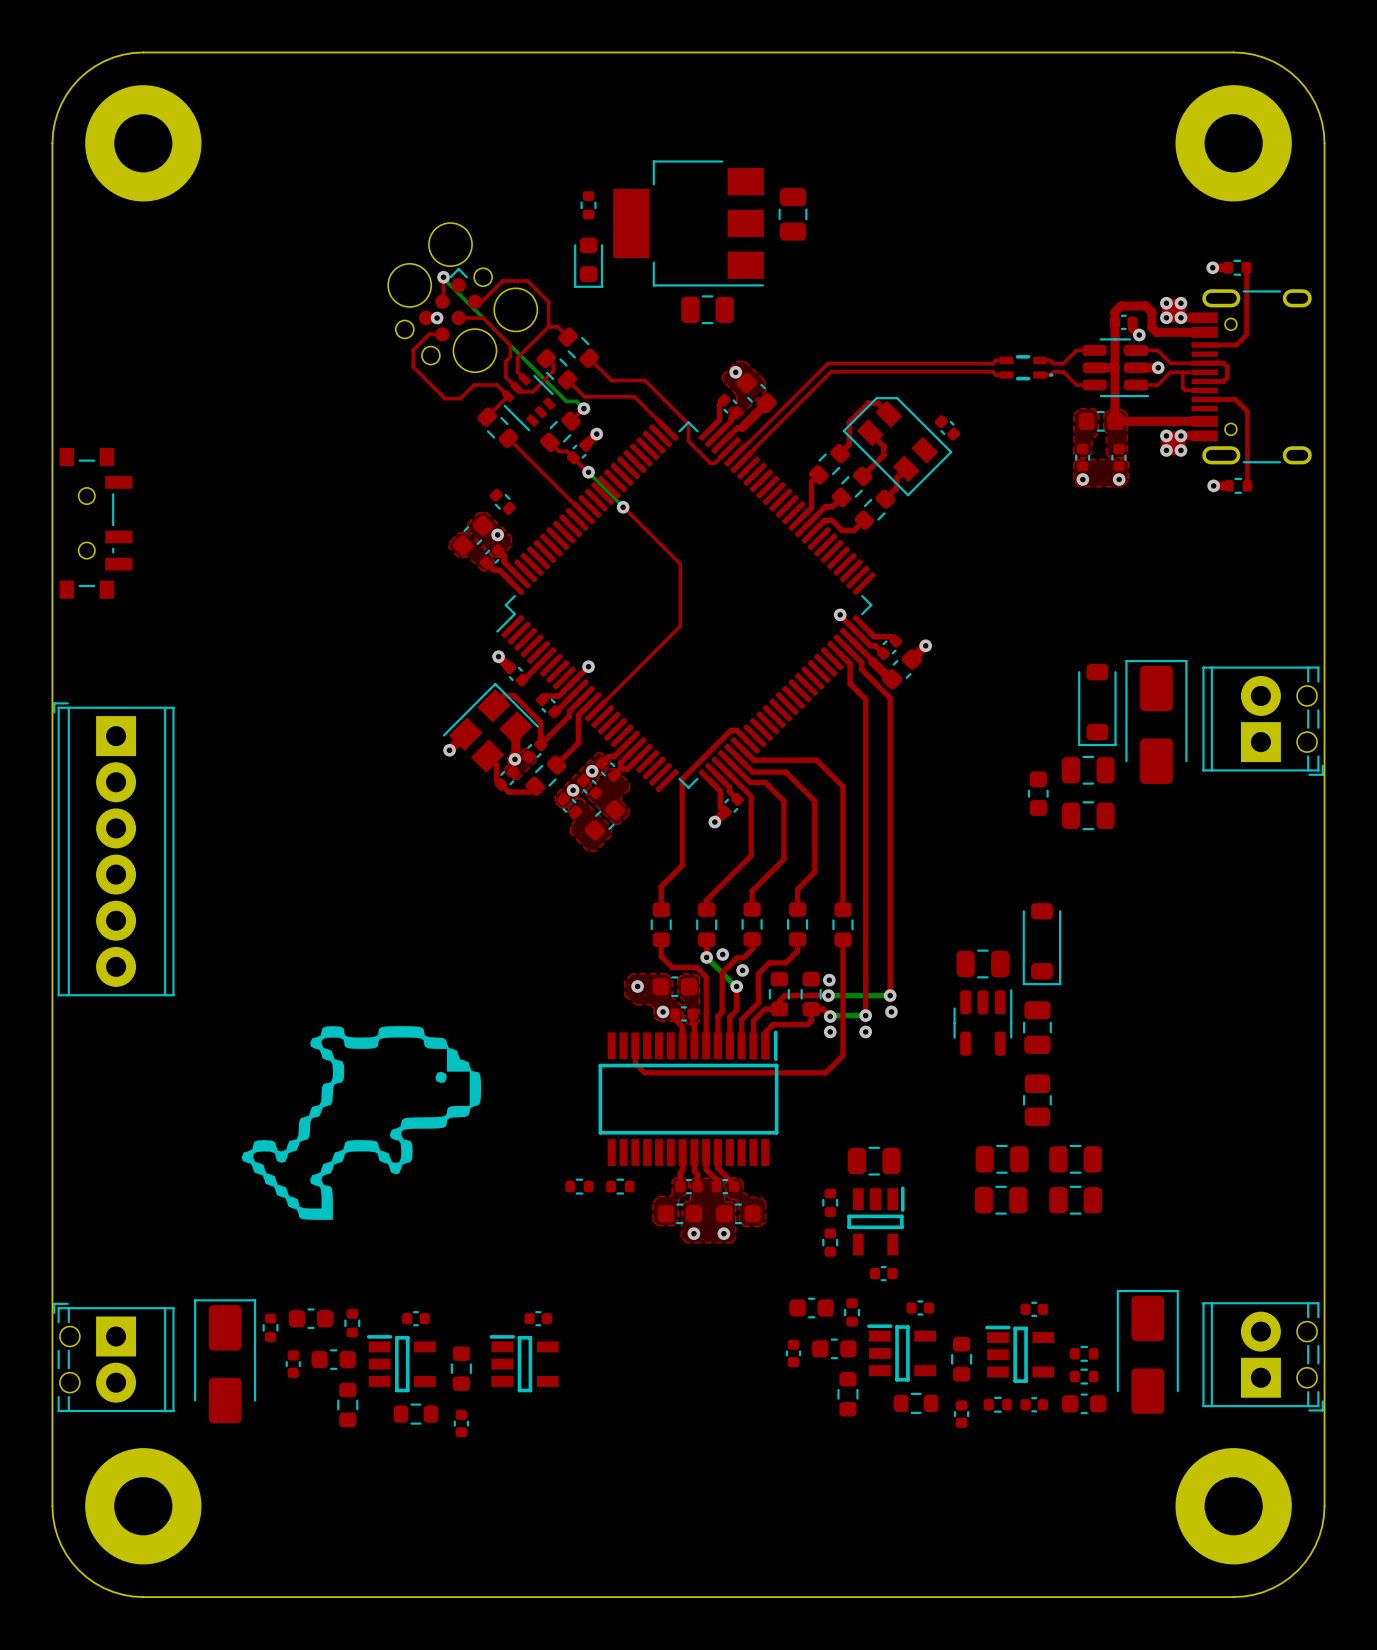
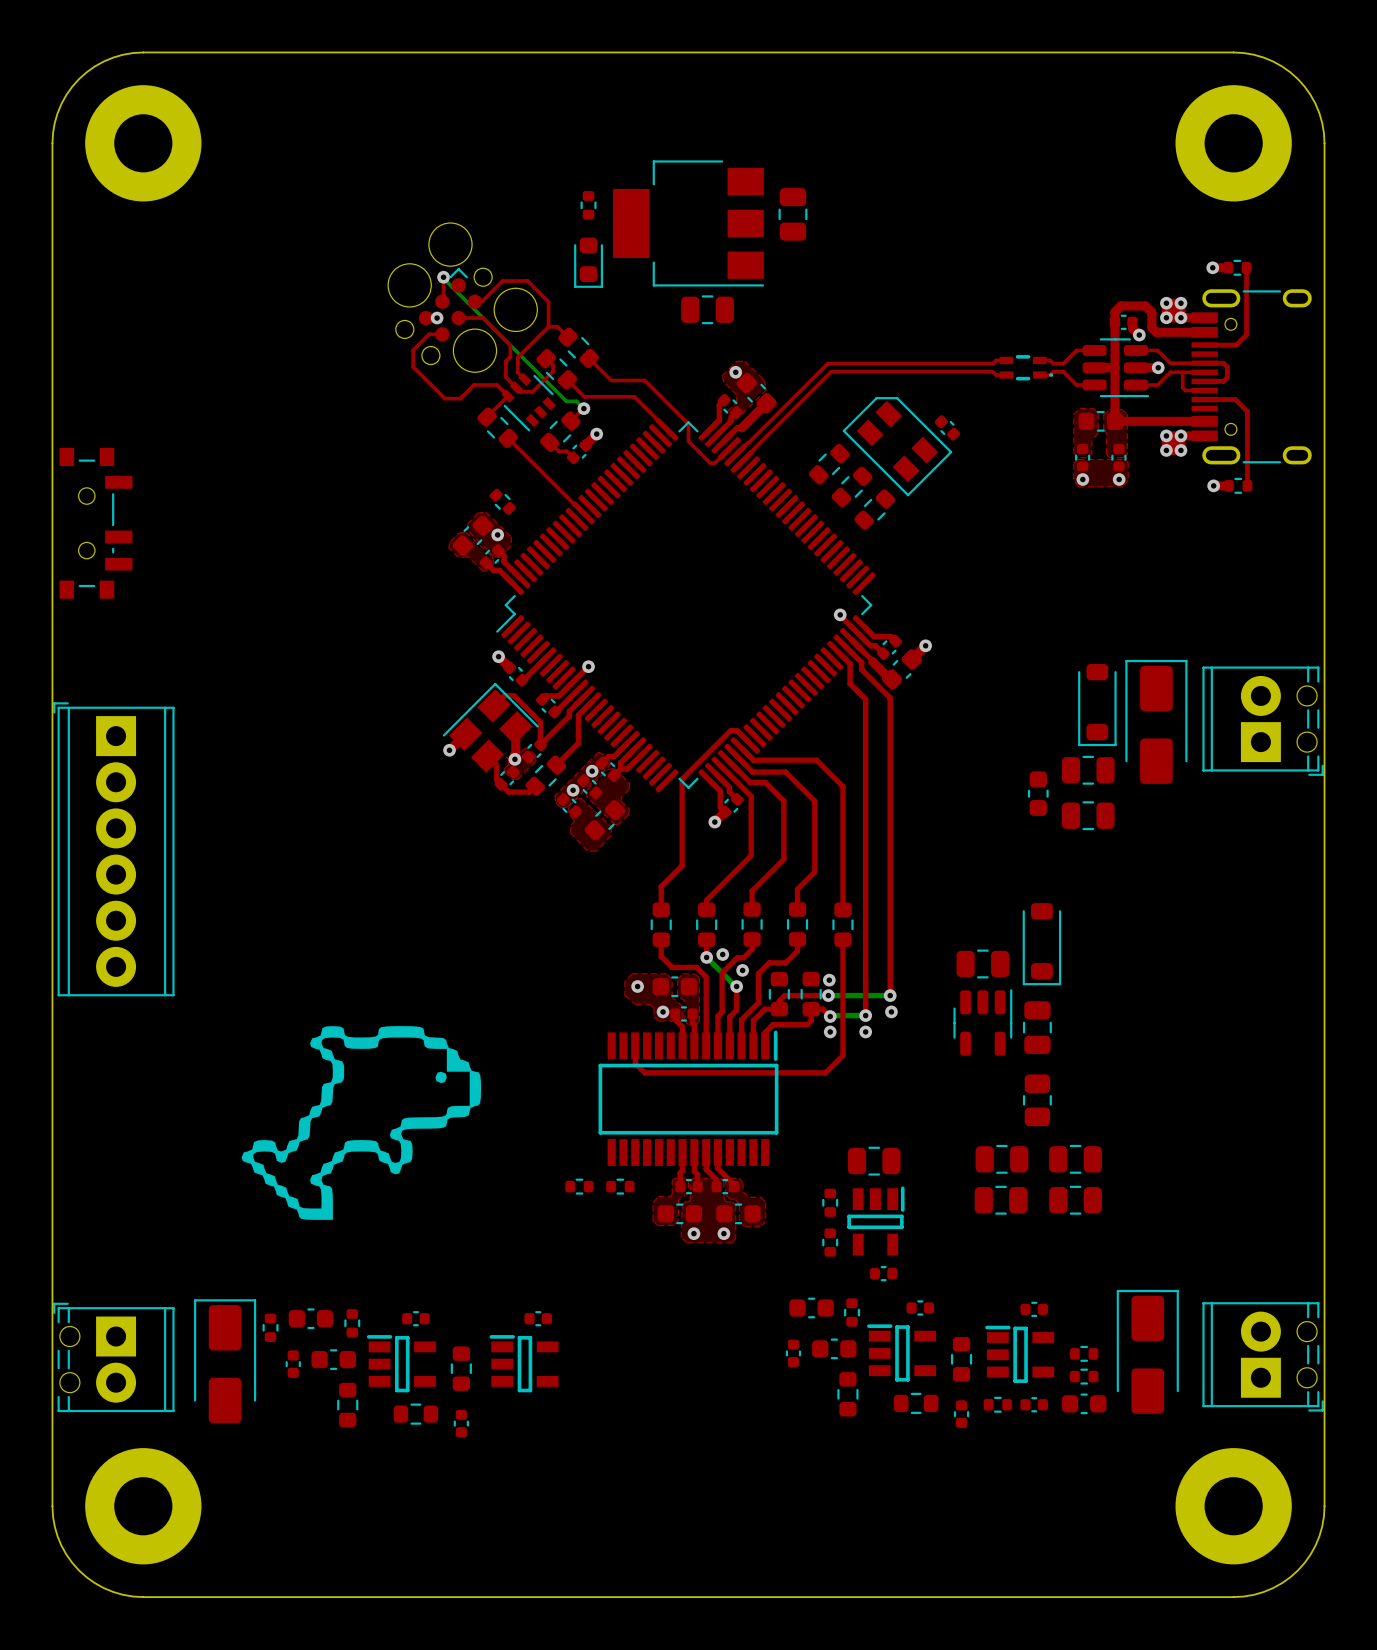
top track: (888, 414) (877, 403) (868, 403) (849, 422) (849, 444) (839, 453) -> none
top track: (870, 432) (883, 446) (883, 455) (862, 476) -> none
top track: (906, 468) (896, 478) (896, 487) (885, 499) -> none
bottom track: (588, 472) (623, 507) -> none
via: (588, 472) -> none
top track: (818, 474) (811, 482) (811, 507) (799, 519) -> none
top track: (841, 497) (832, 506) (825, 506) (806, 525) -> none
top track: (623, 507) (680, 564) (680, 626) (596, 710) -> none
via: (623, 507) -> none
top track: (864, 520) (854, 530) (842, 530) (832, 520) (824, 520) (812, 532) -> none

